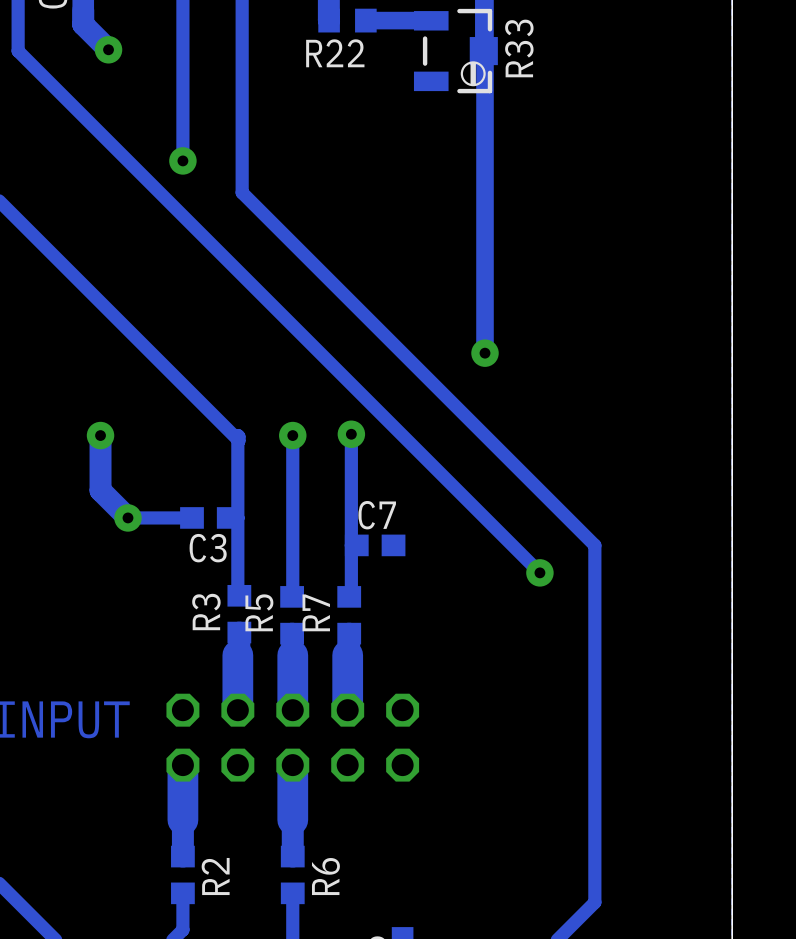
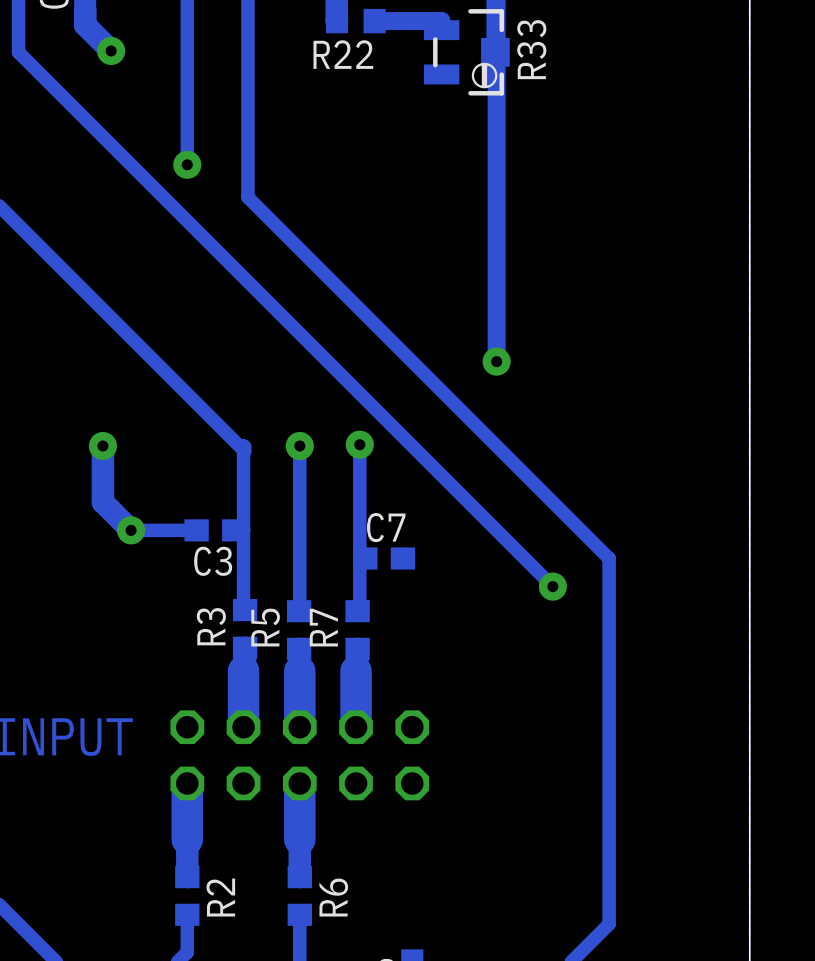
R33 footprint: [413, 8, 498, 94] -> [423, 9, 510, 96]

